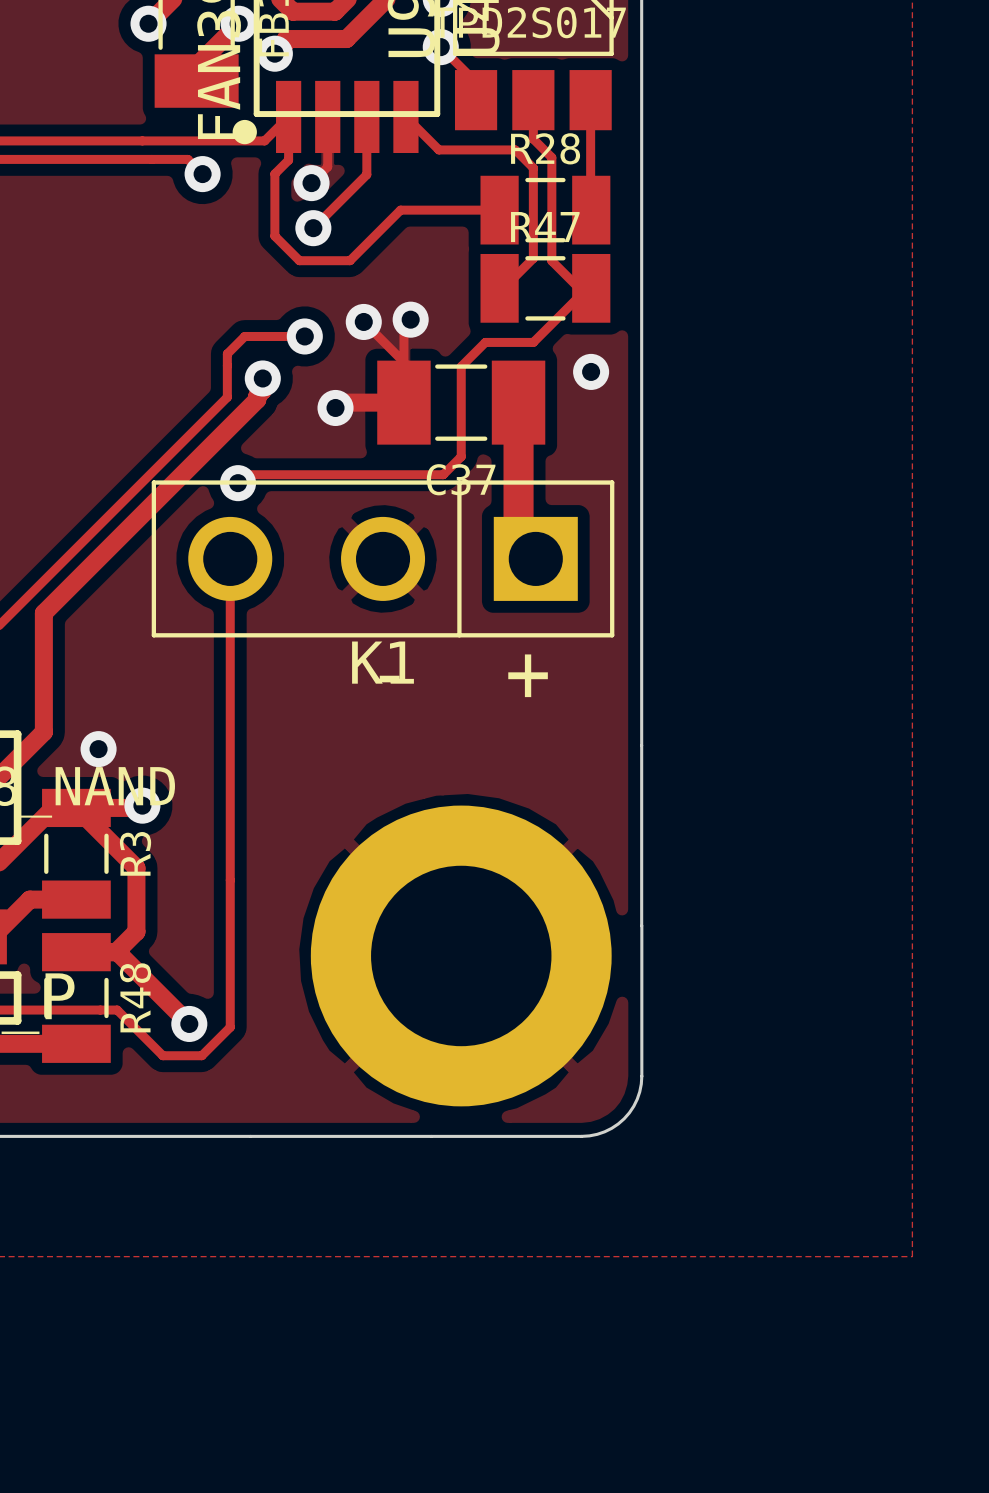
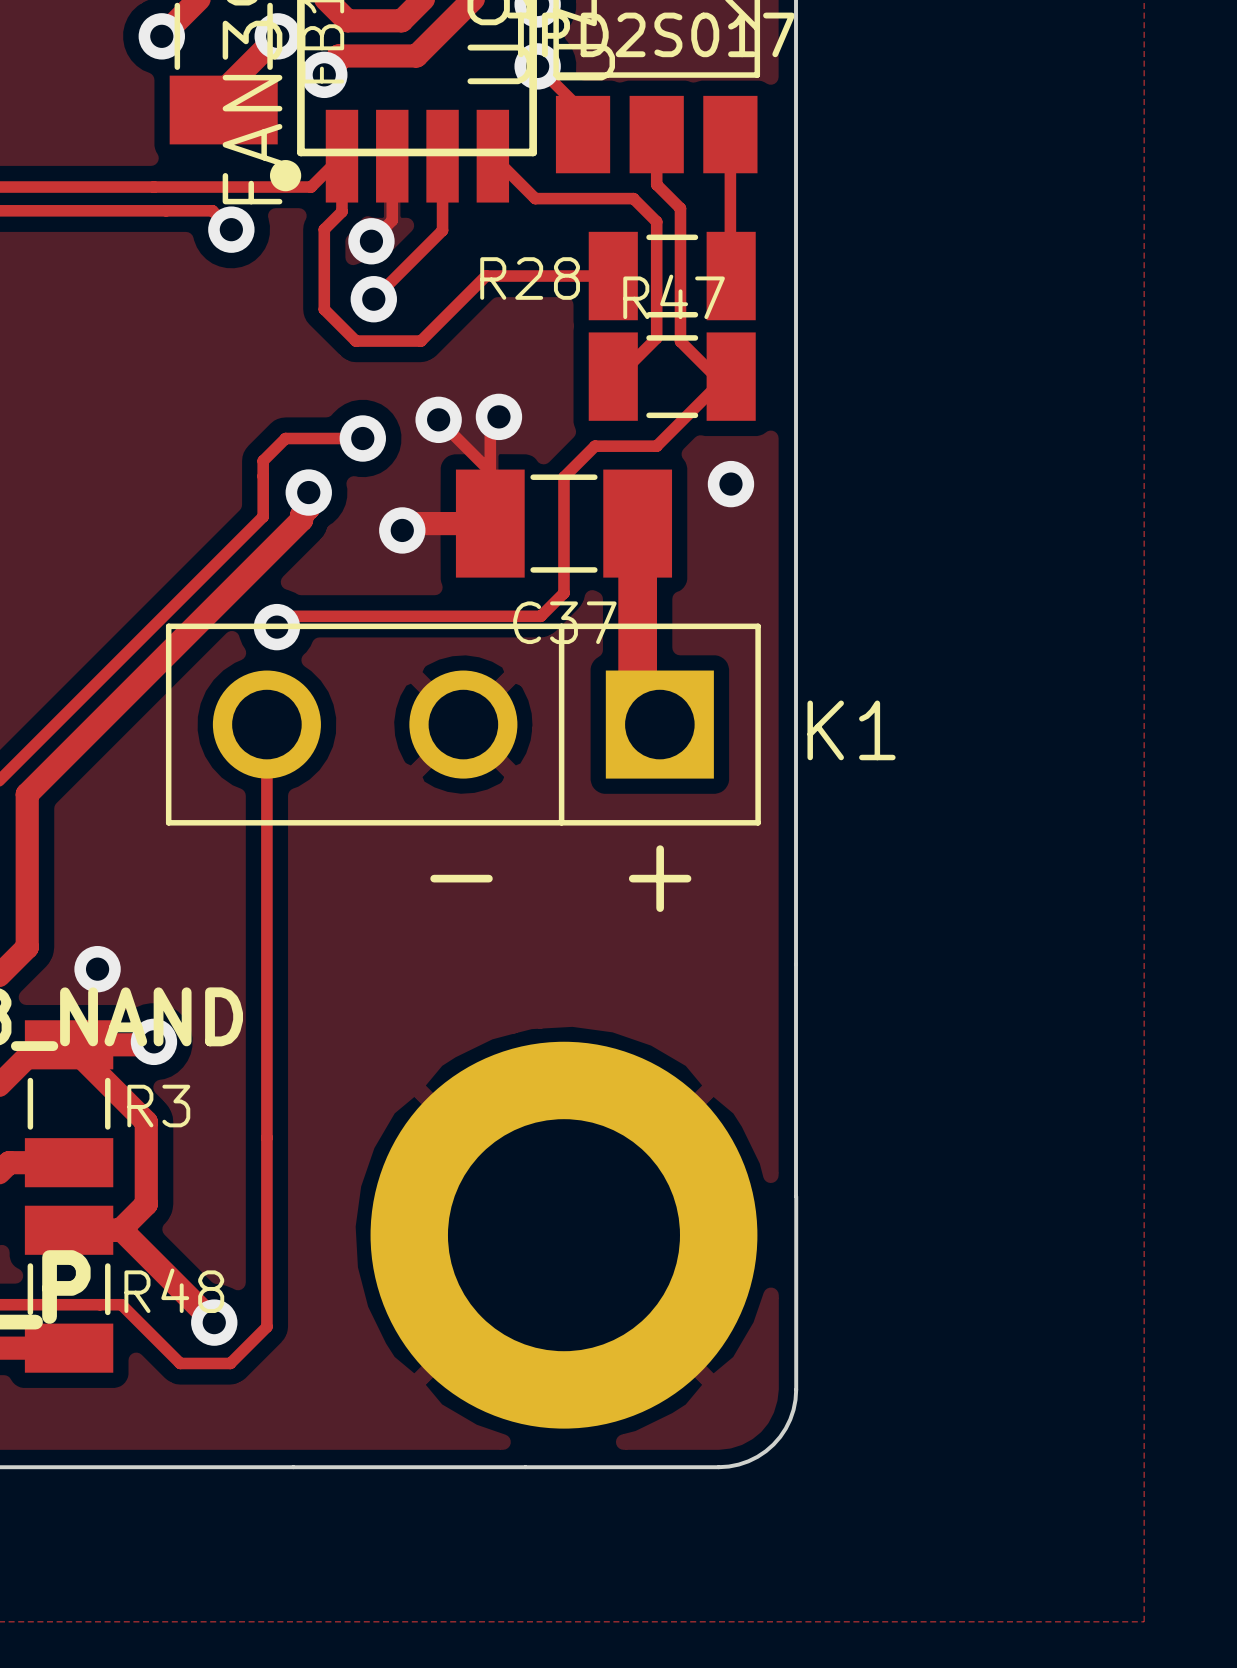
R28 name position: R28 (545, 148) -> R28 (530, 278)
K1 name position: K1 (383, 662) -> K1 (851, 730)
R3 name rotation: 0° (135, 853) -> 90° clockwise (158, 1106)
R48 name rotation: 0° (135, 997) -> 90° clockwise (174, 1290)

